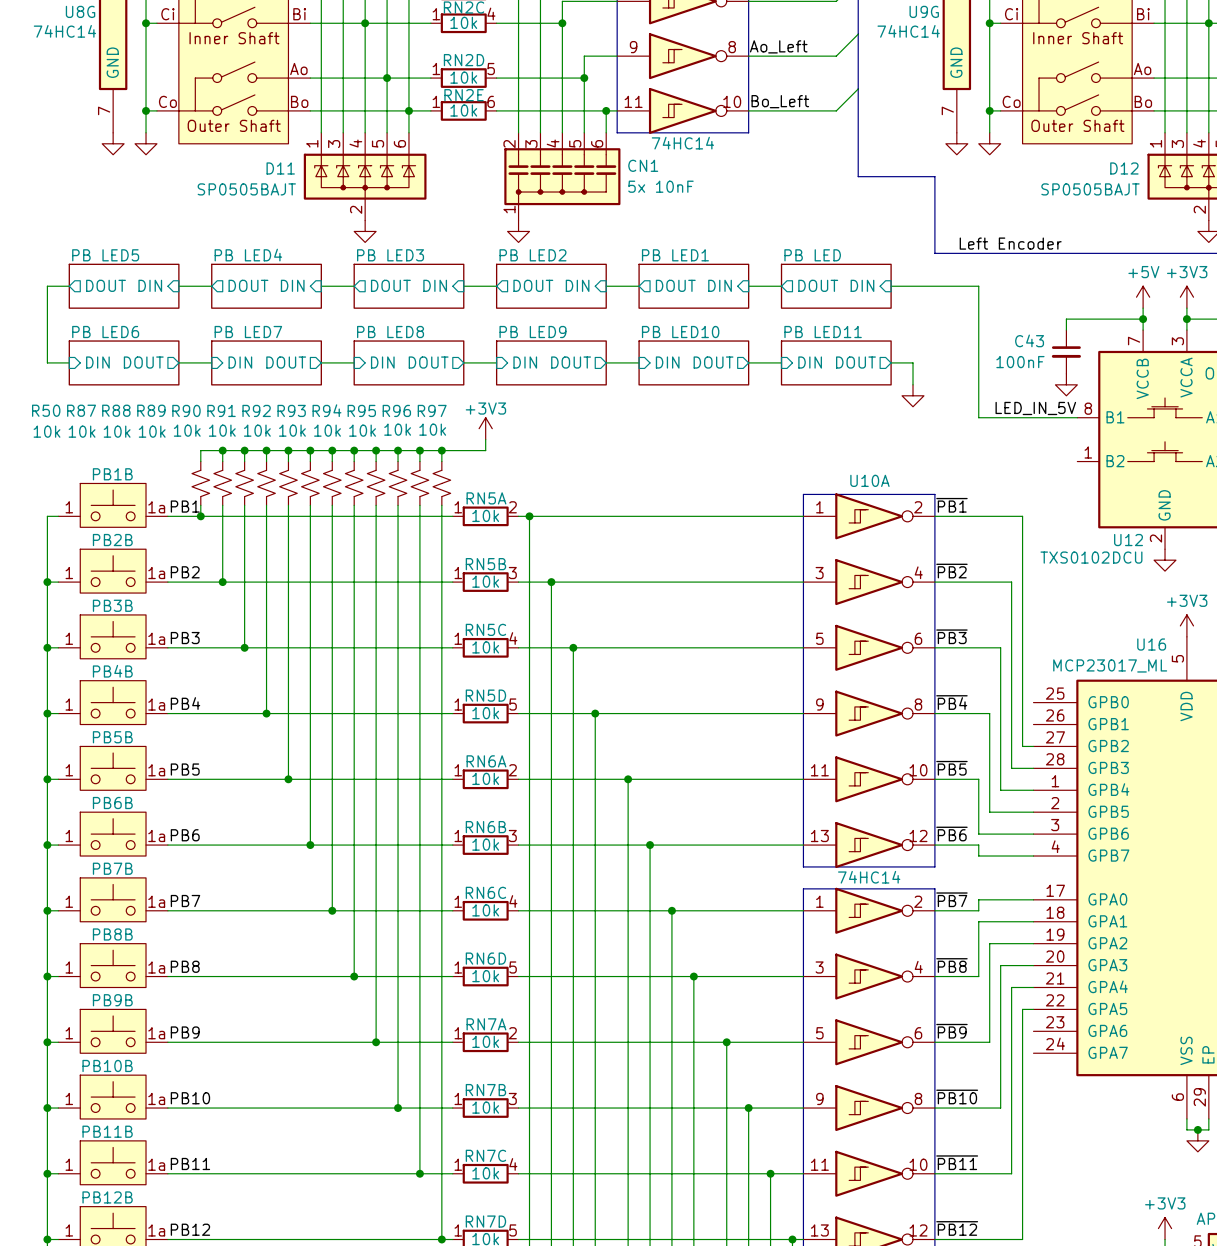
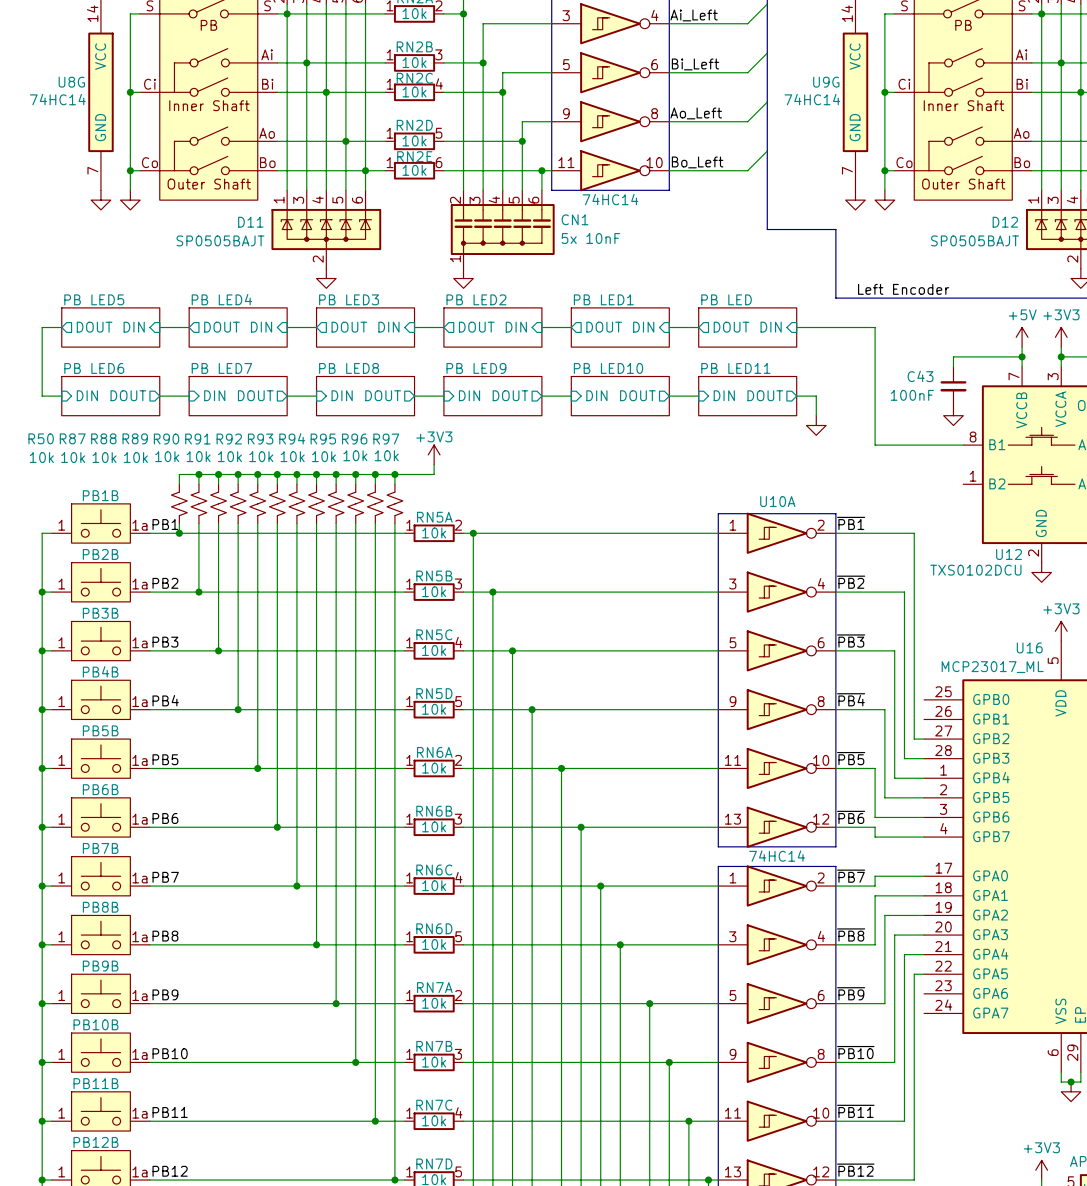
label: LED_IN_5V (1035, 408) -> none

